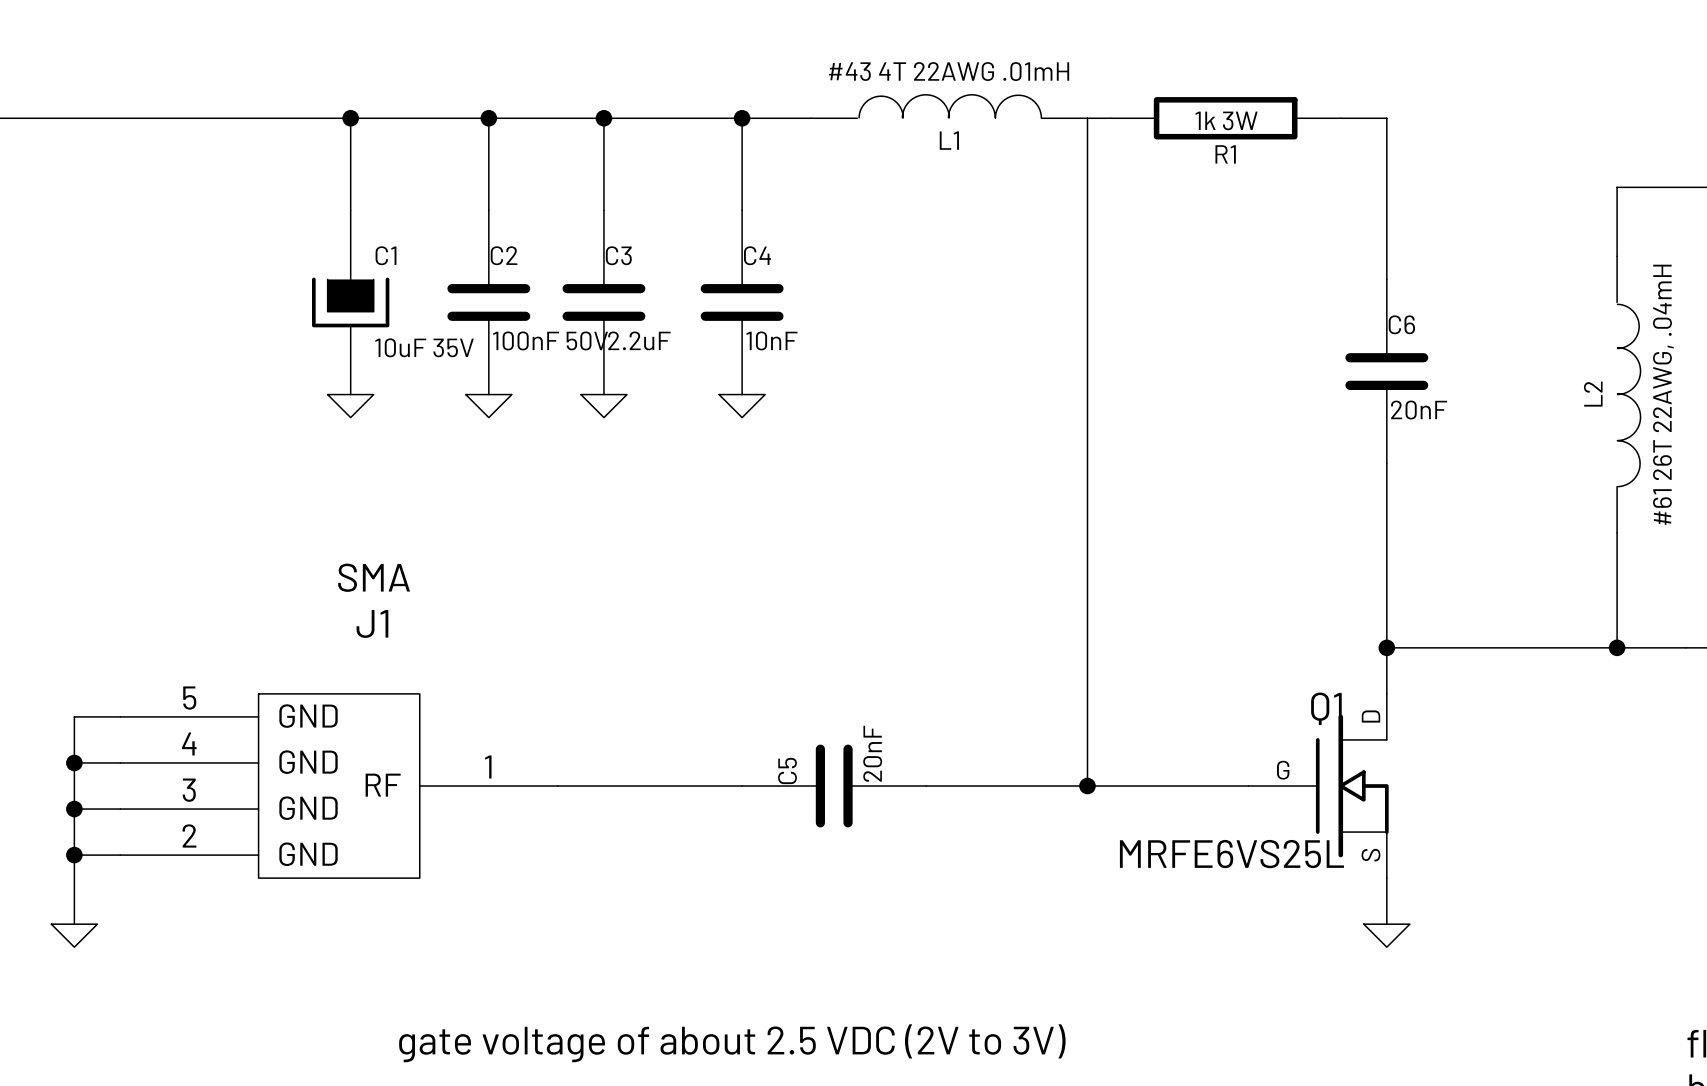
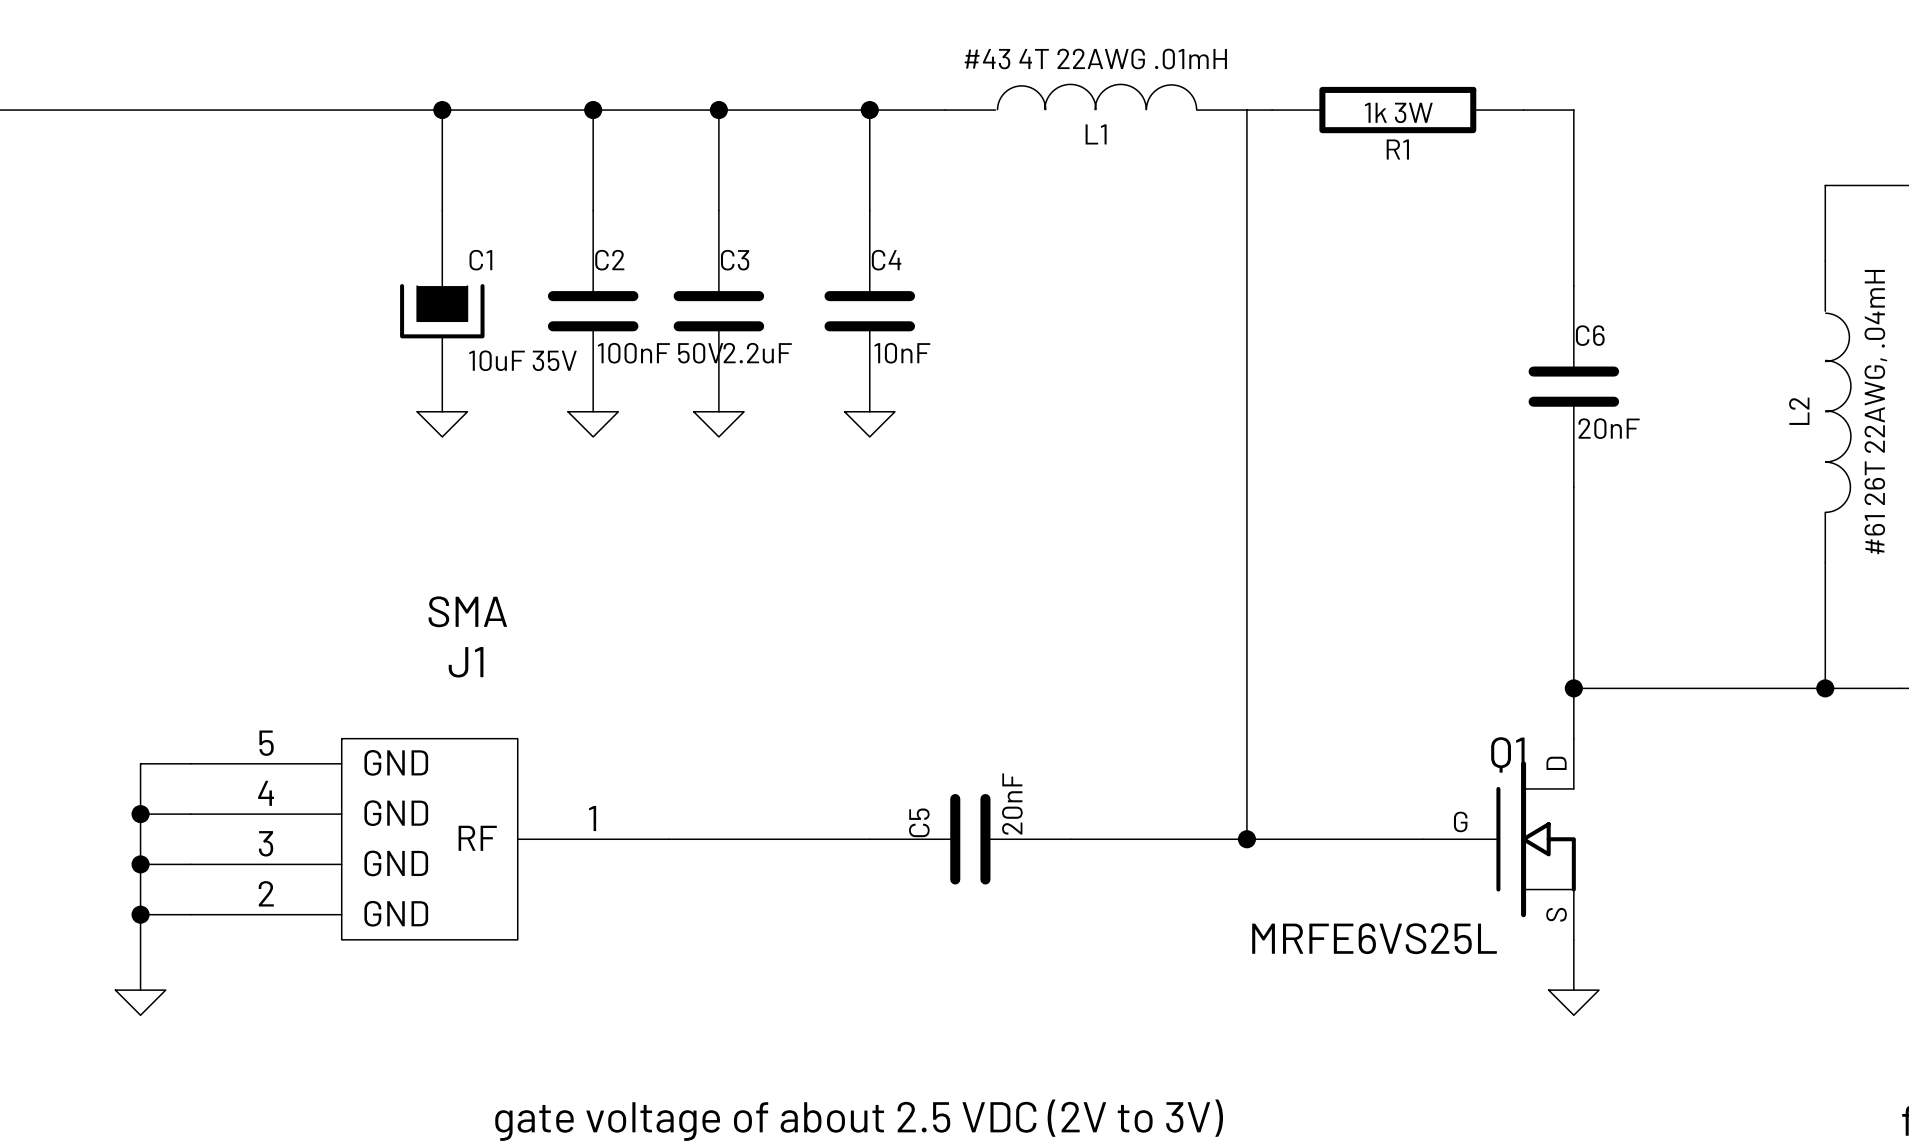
Q1 value position: MRFE6VS25L (1231, 854) -> MRFE6VS25L (1374, 938)

